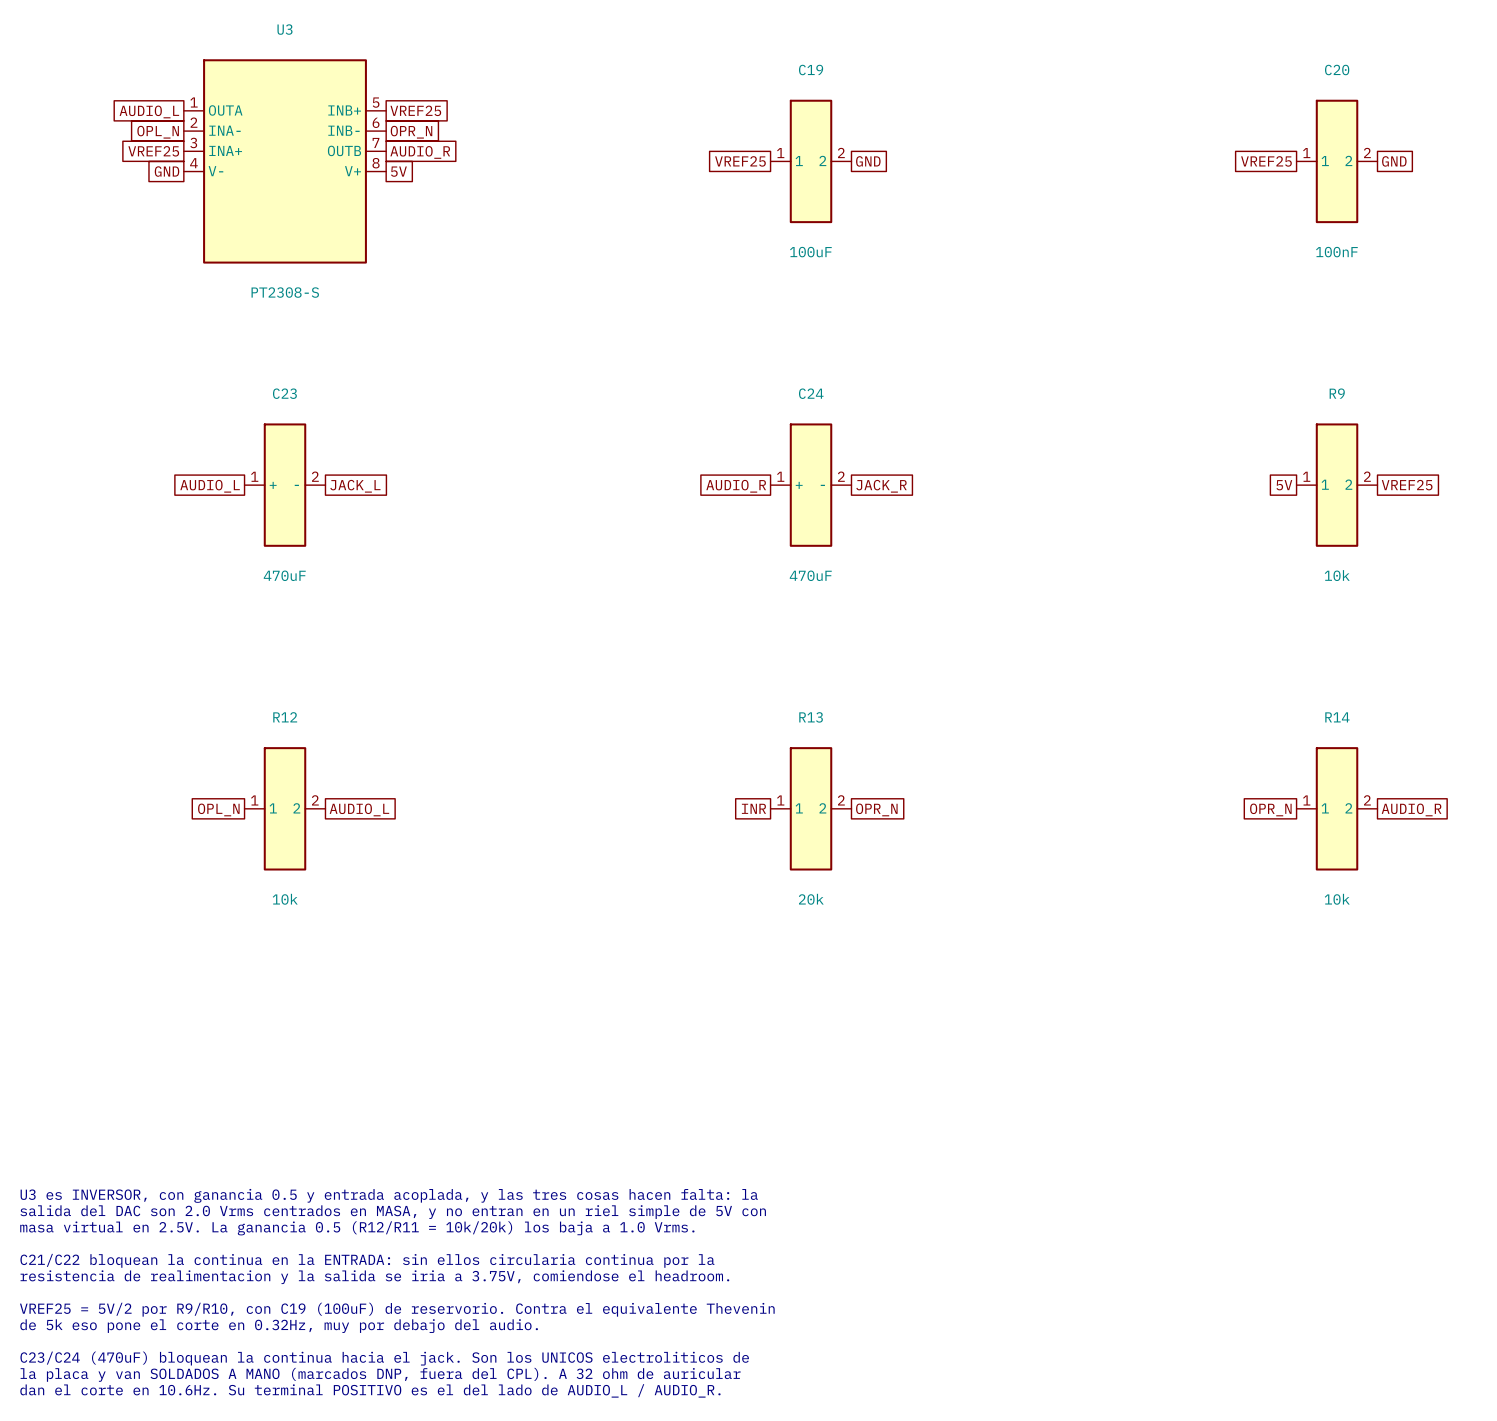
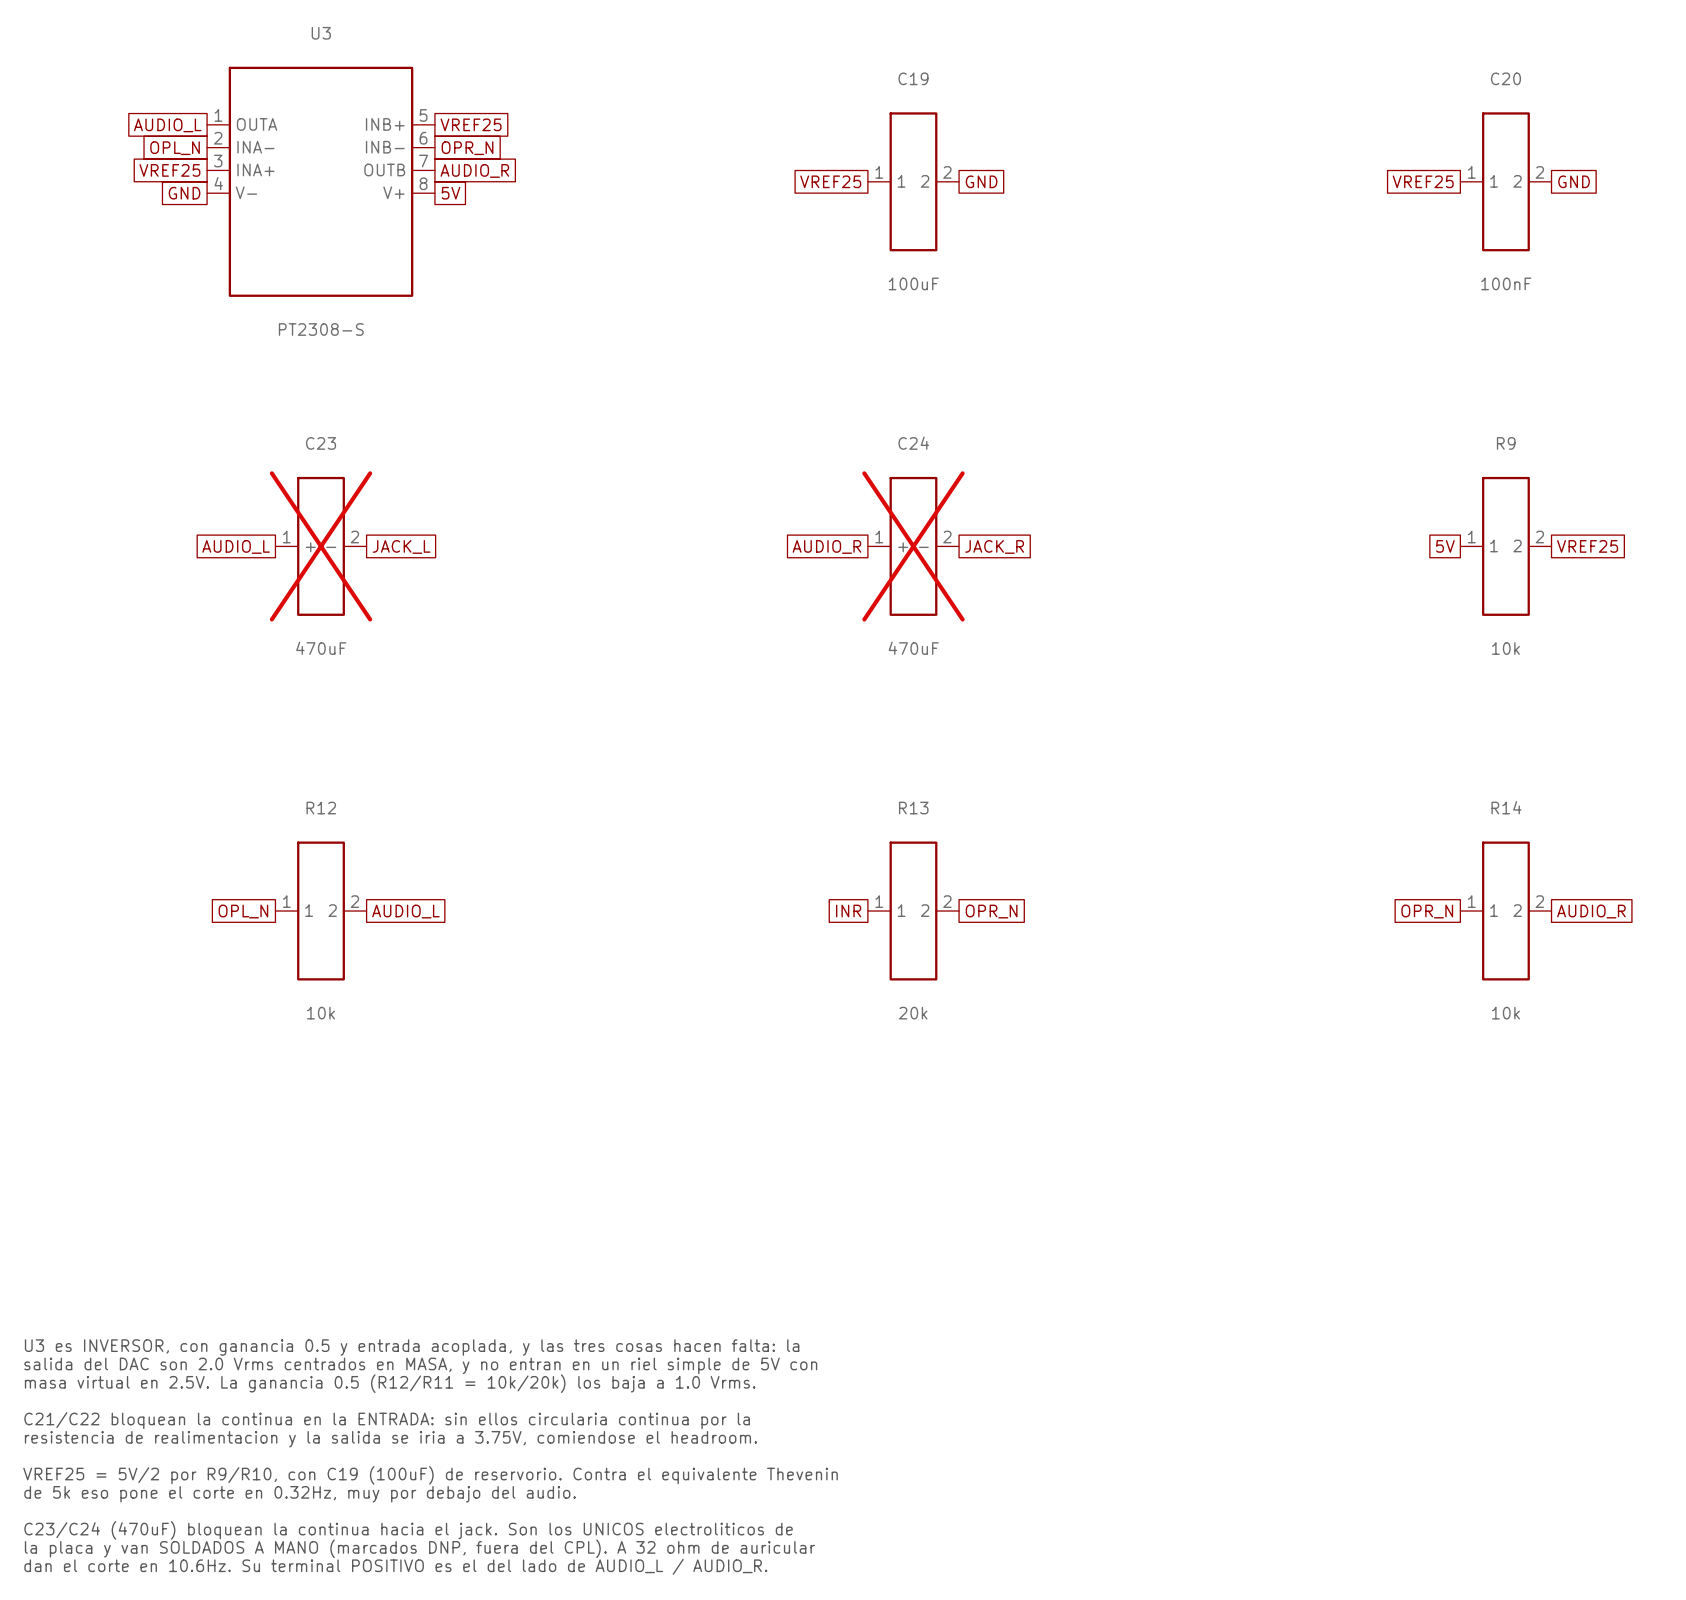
C23 do-not-place cross: none -> (321, 546)
C24 do-not-place cross: none -> (913, 546)

